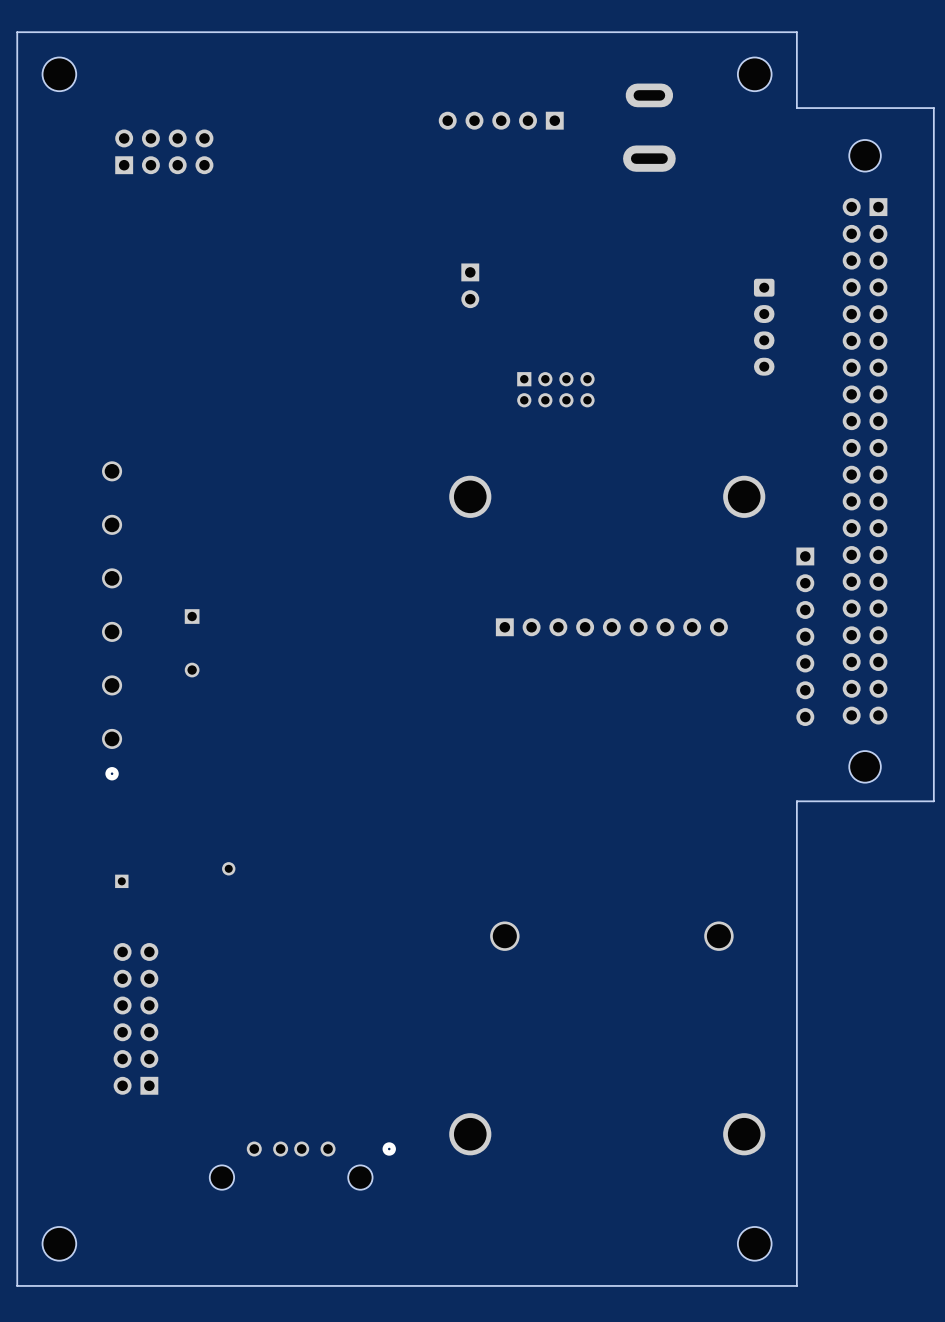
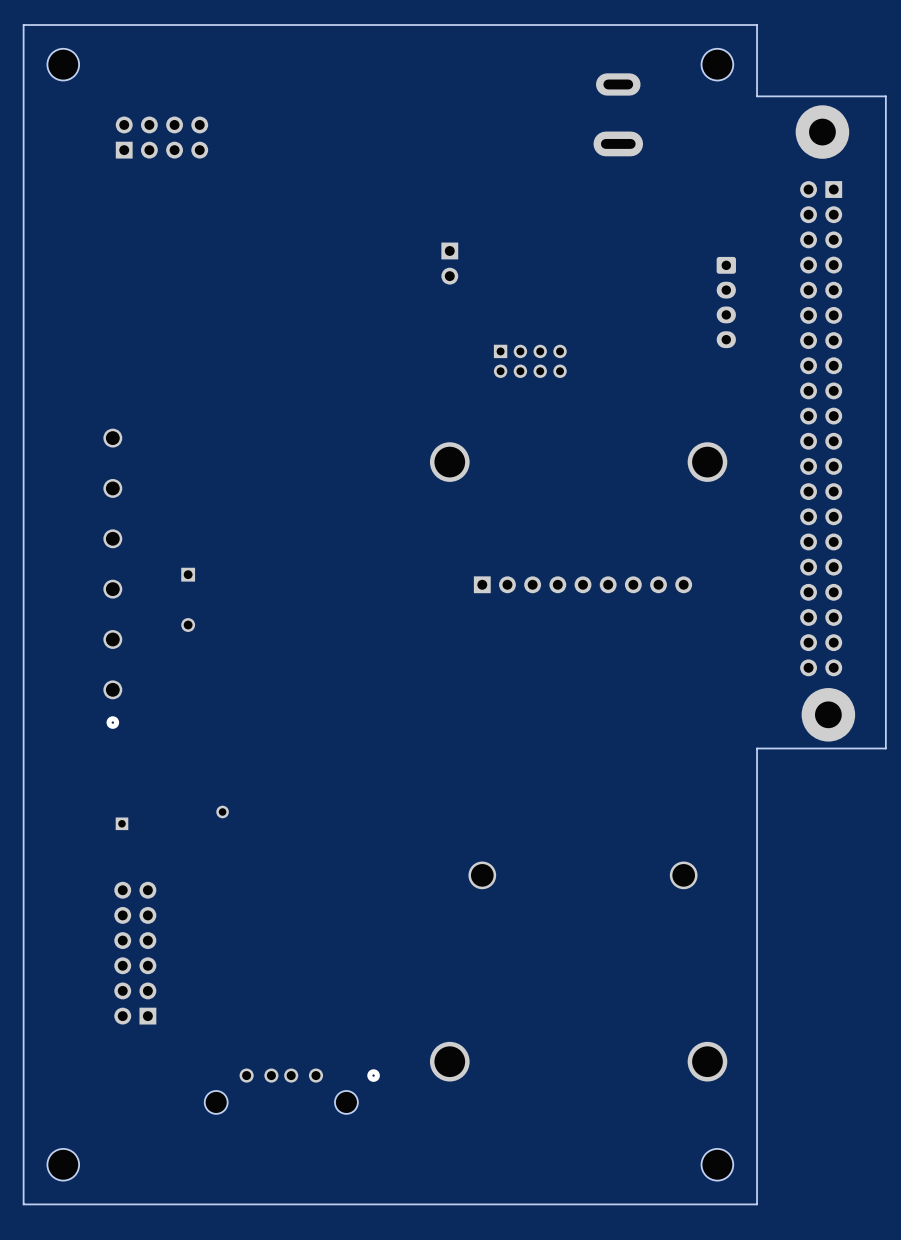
part: (501, 120) -> none
part footprint: [849, 139, 881, 172] -> [795, 105, 850, 159]
part: (805, 636) -> none
part footprint: [849, 751, 881, 783] -> [801, 688, 856, 742]

